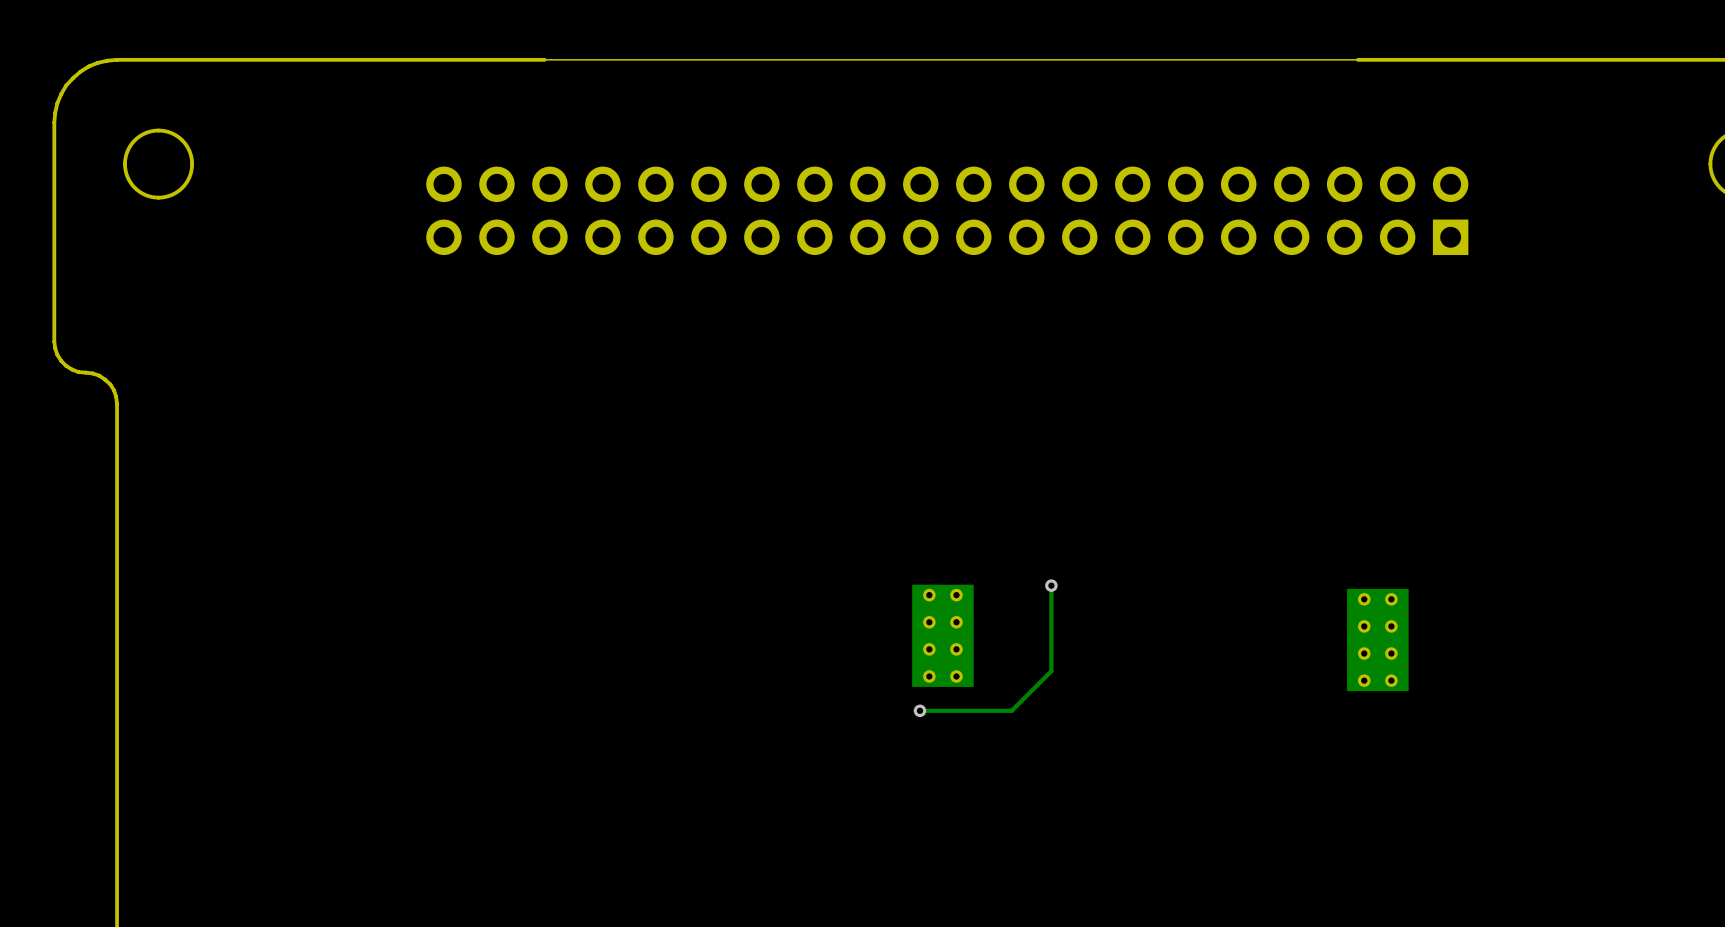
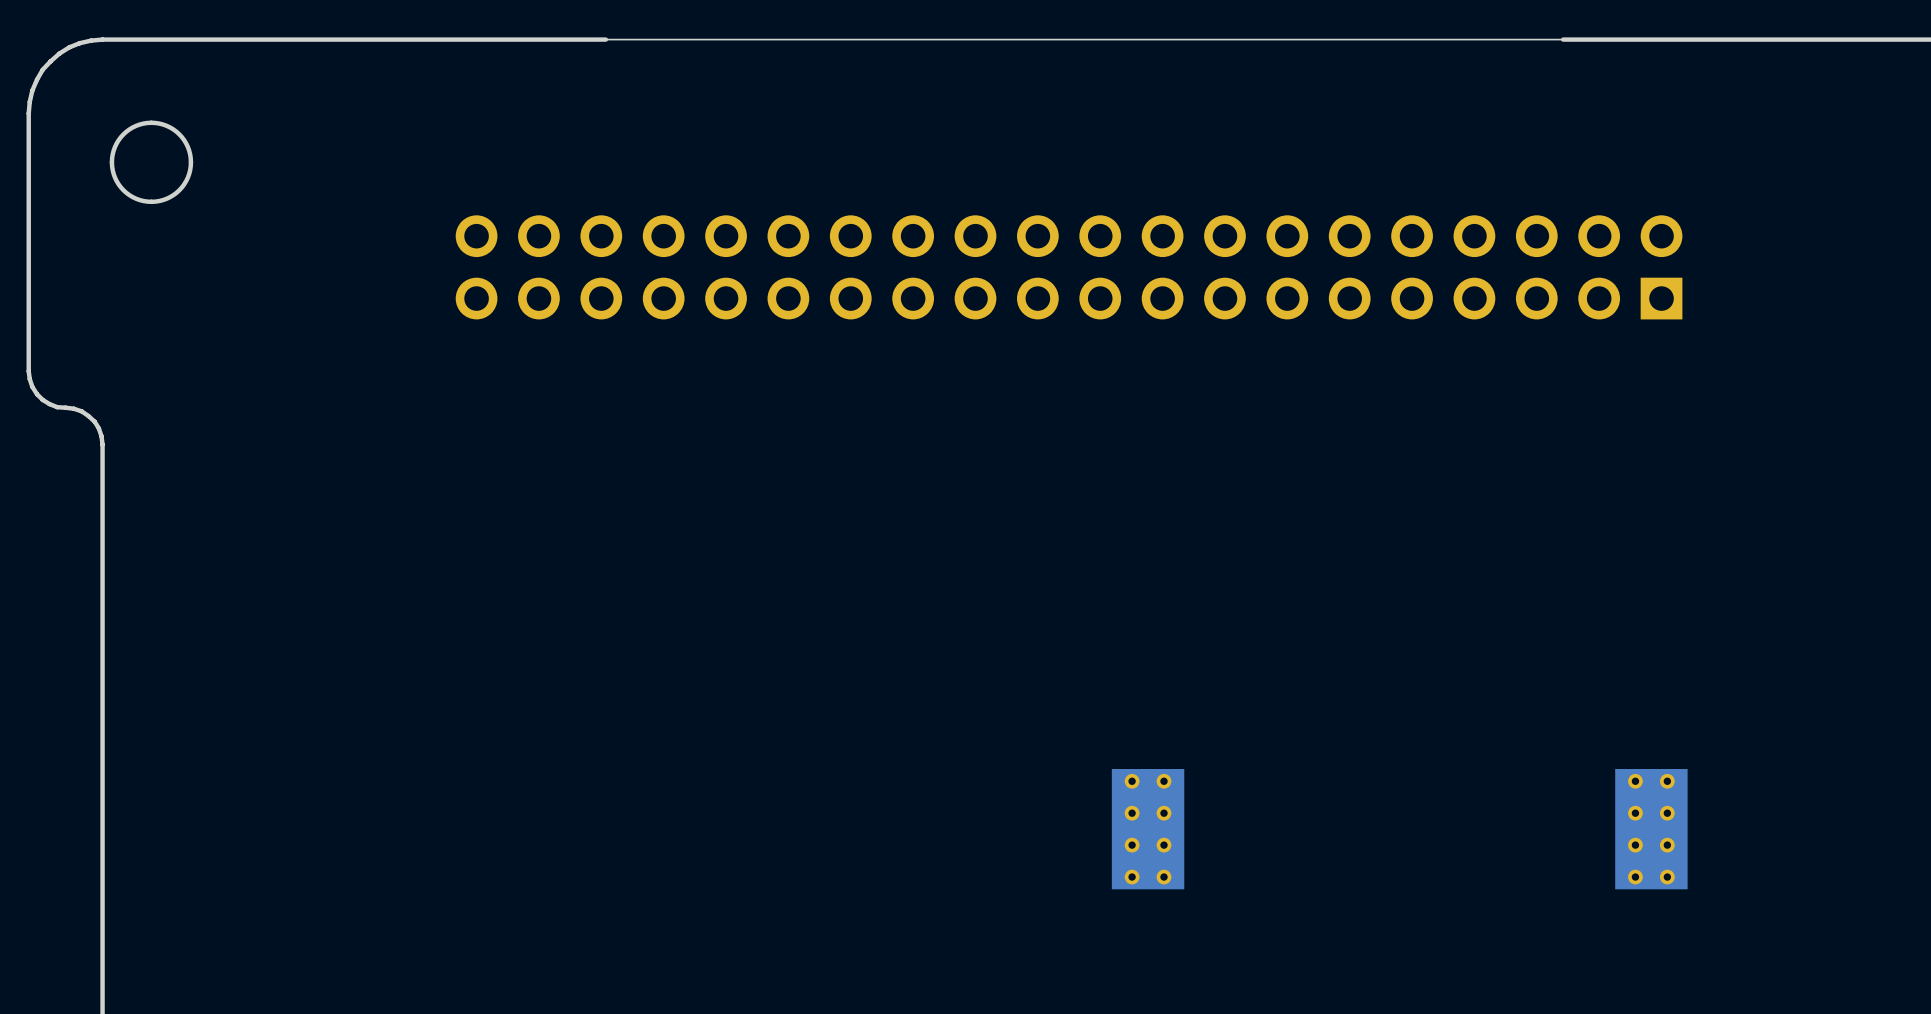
part position: (947, 210) -> (1069, 267)
track: (1051, 585) (1051, 671) (1011, 710) (919, 710) -> none
via: (1051, 585) -> none
part position: (942, 635) -> (1148, 829)
part position: (1377, 639) -> (1651, 829)
via: (919, 710) -> none

